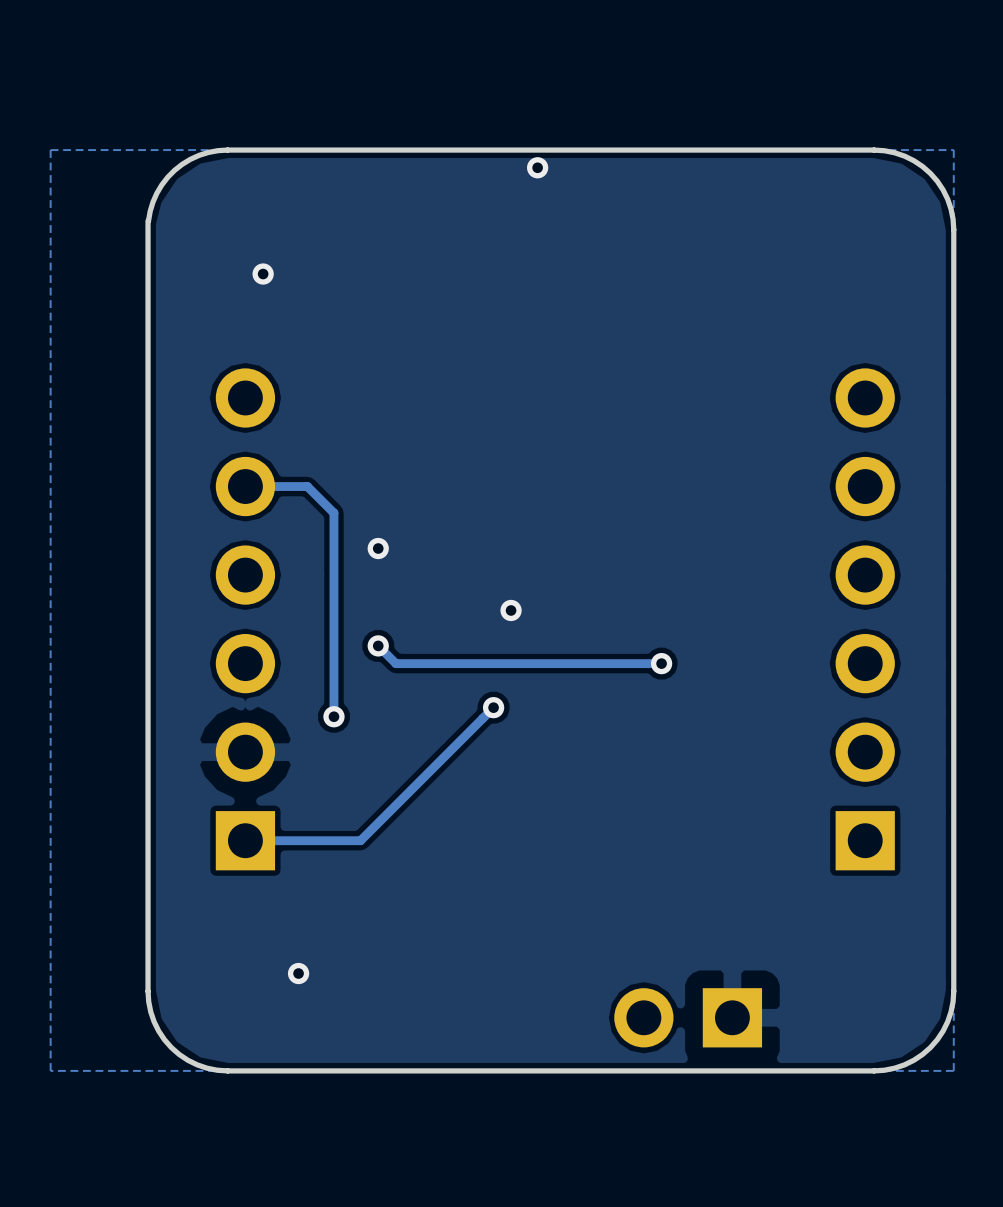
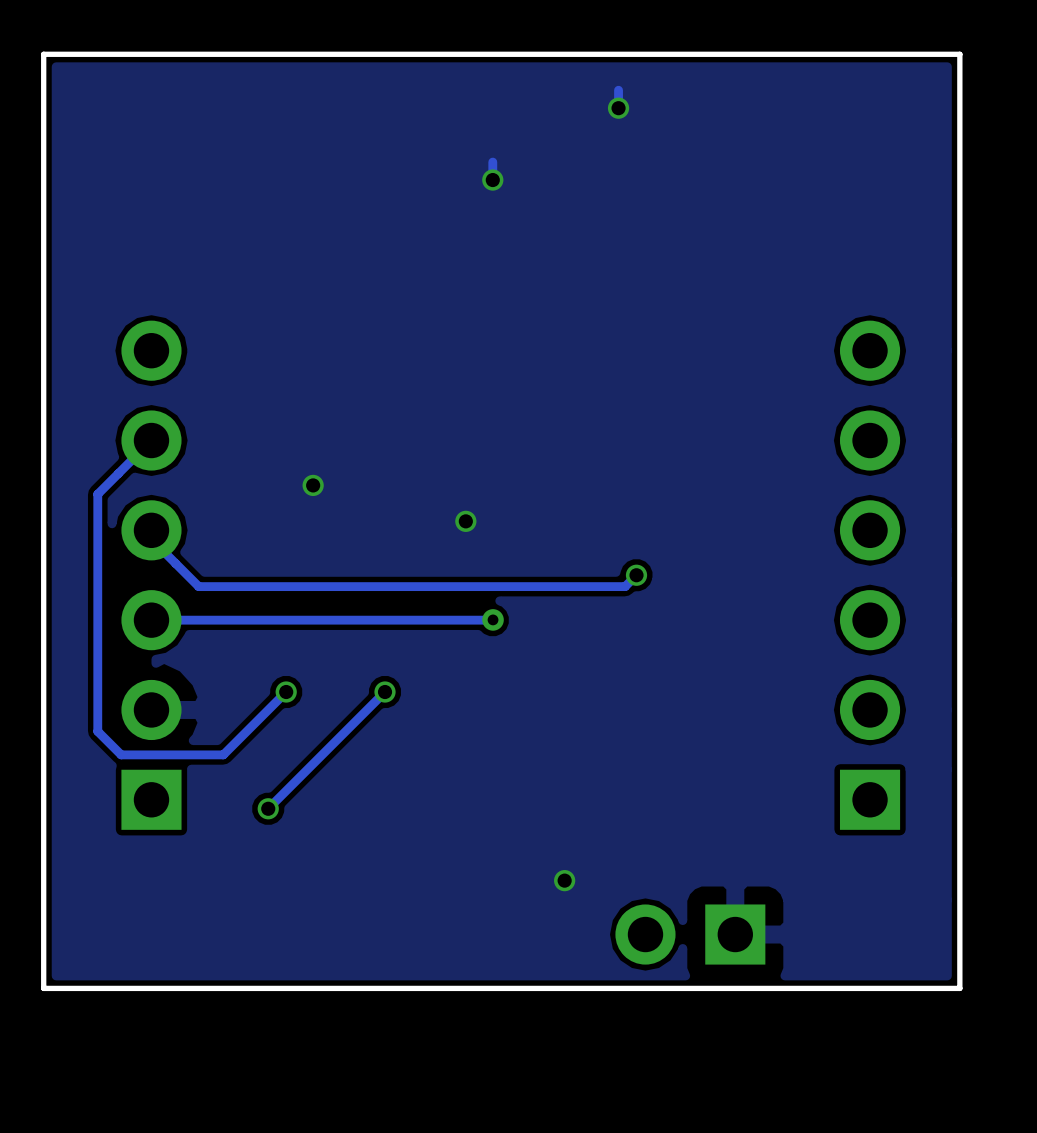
board edge: (227, 150) (199, 155) (174, 170) (156, 193) (148, 220) -> none
board edge: (874, 150) (904, 156) (930, 173) (947, 199) (953, 229) -> (879, 54) (959, 54) (959, 135)
via: (537, 167) -> none
track: none -> (618, 90) (618, 108)
via: none -> (618, 108)
board edge: (148, 220) (148, 1001) (158, 1031) (171, 1047) (197, 1064) (227, 1070) -> (223, 54) (43, 54) (43, 988) (223, 988)
track: none -> (492, 162) (492, 180)
via: (263, 274) -> none
via: none -> (492, 180)
track: (245, 486) (307, 486) (333, 513) (333, 716) -> none
track: none -> (151, 440) (97, 494) (97, 731) (121, 754) (223, 754) (286, 692)
via: (378, 548) -> none
via: none -> (313, 485)
via: none -> (465, 521)
via: (511, 610) -> none
track: none -> (142, 530) (198, 586) (625, 586) (636, 575)
part position: (245, 619) -> (151, 575)
part position: (865, 619) -> (870, 575)
track: (378, 645) (395, 663) (661, 663) -> none
via: (378, 645) -> none
via: none -> (636, 575)
via: (661, 663) -> none
track: (493, 707) (360, 840) (245, 840) -> (492, 620) (151, 620)
via: (333, 716) -> none
via: none -> (286, 692)
track: none -> (385, 692) (268, 808)
via: none -> (385, 692)
via: none -> (268, 808)
via: none -> (564, 880)
via: (298, 973) -> none
board edge: (953, 991) (947, 1021) (930, 1047) (904, 1064) (874, 1070) -> (959, 907) (959, 988) (879, 988)

